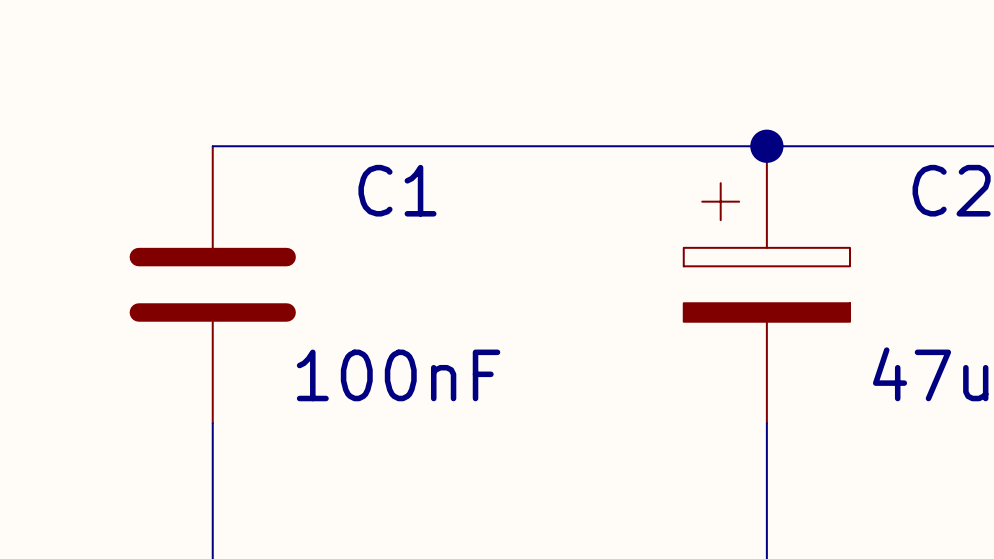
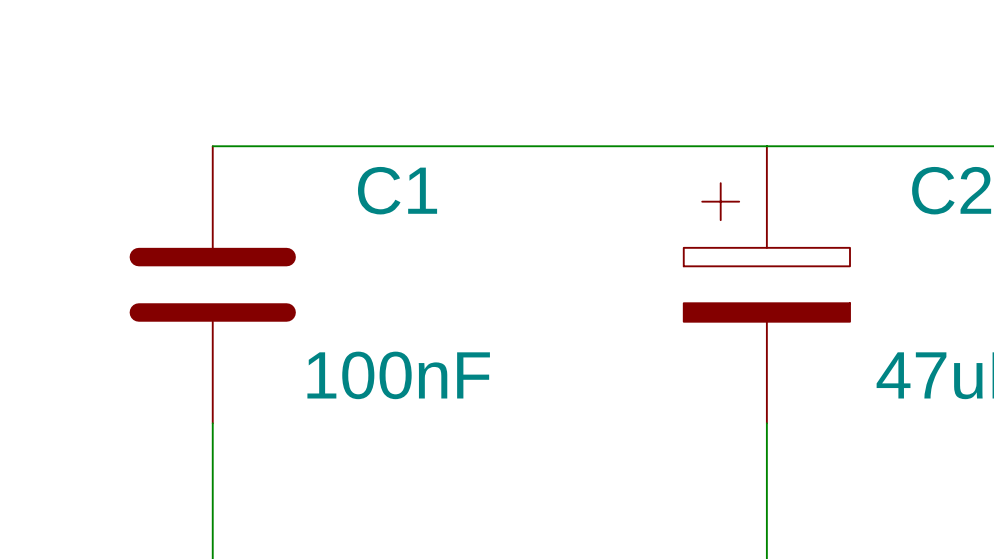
junction: (766, 146) -> none

